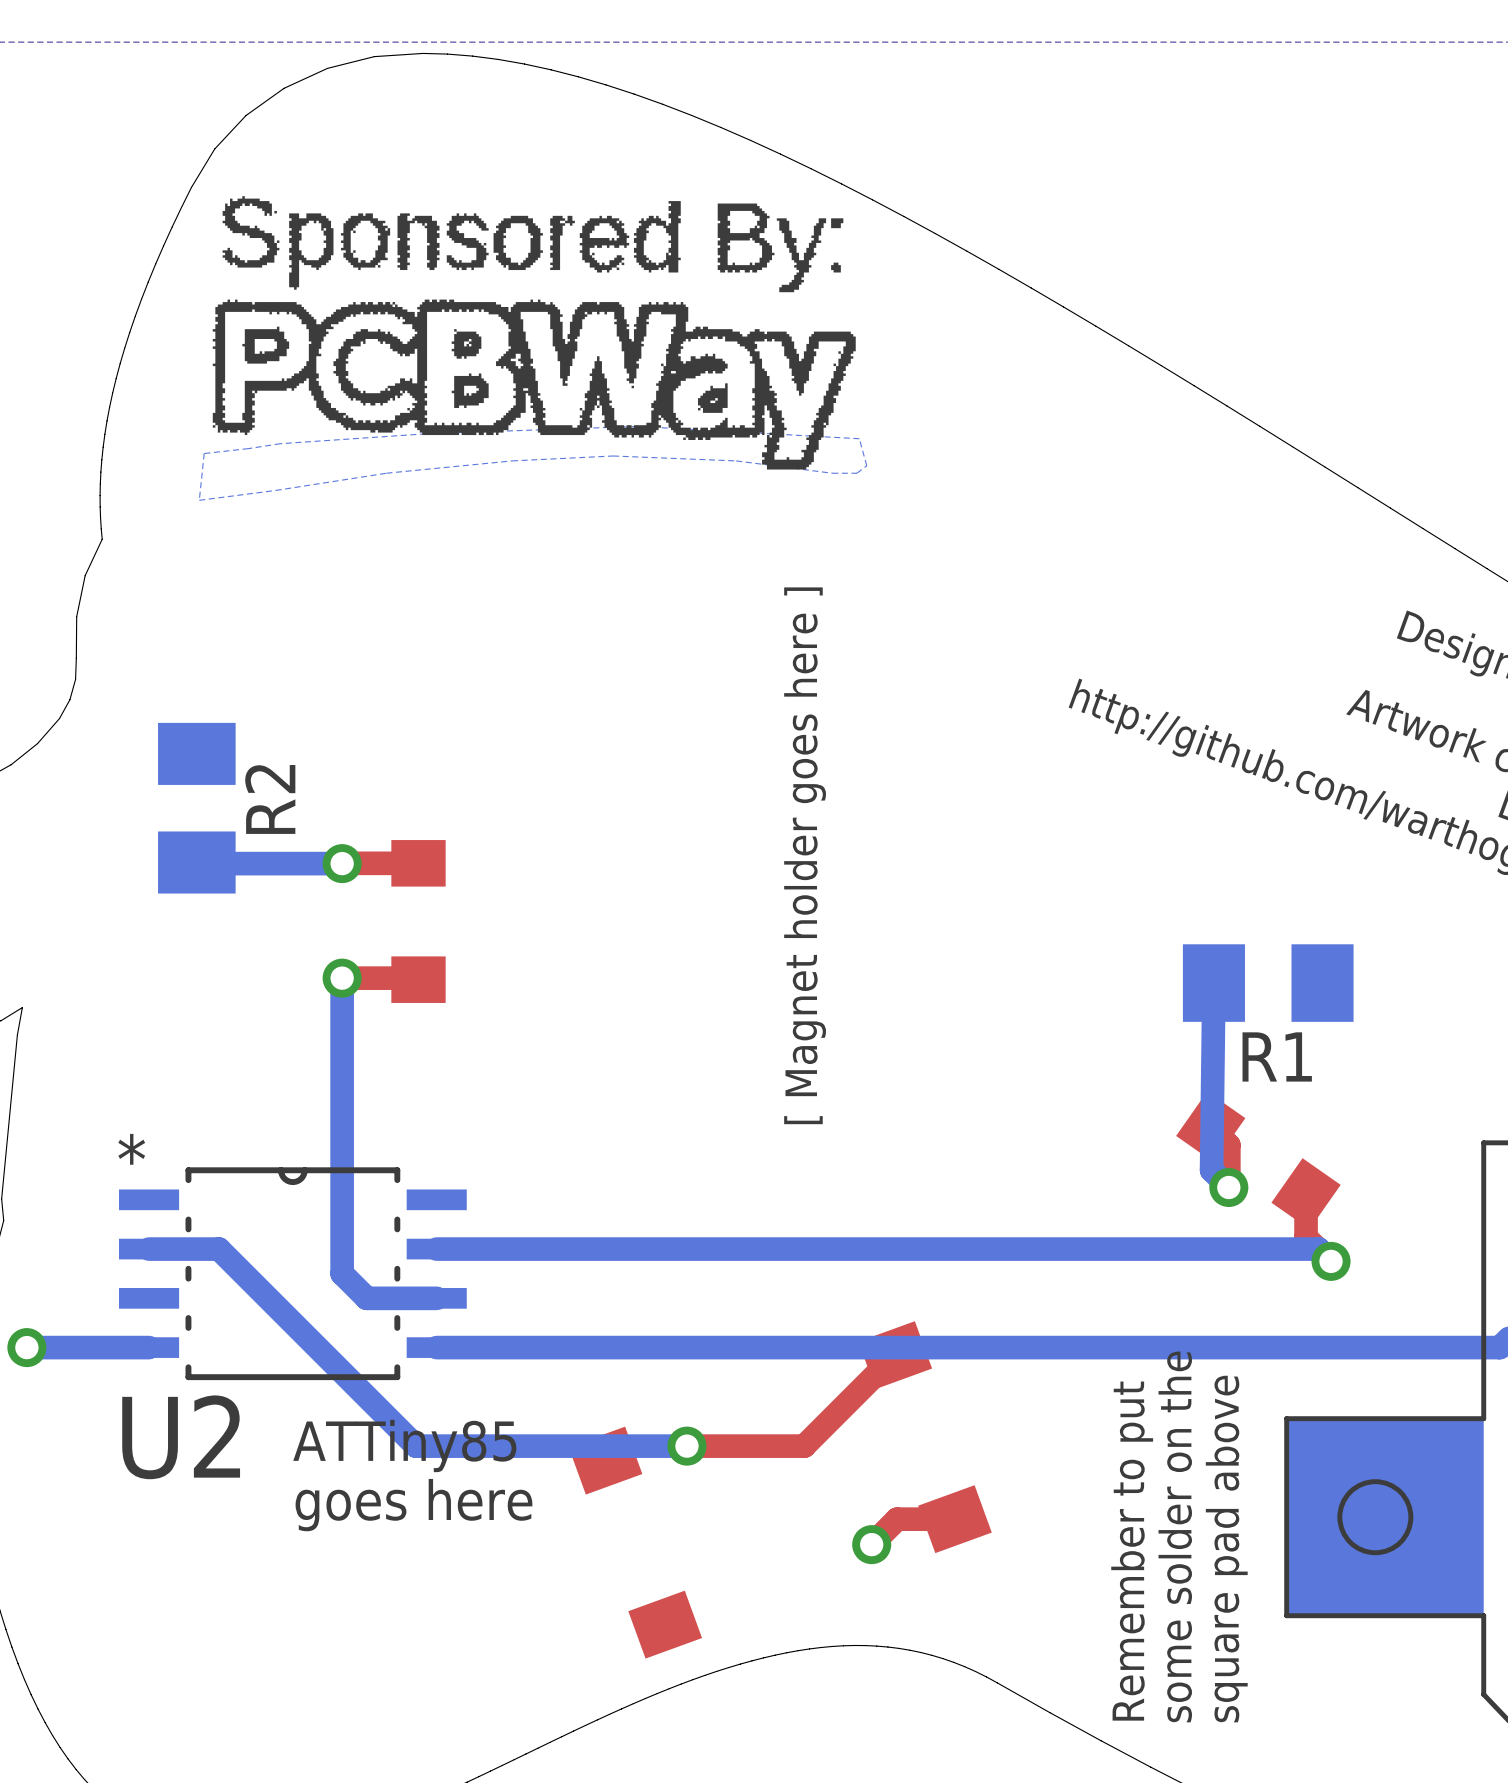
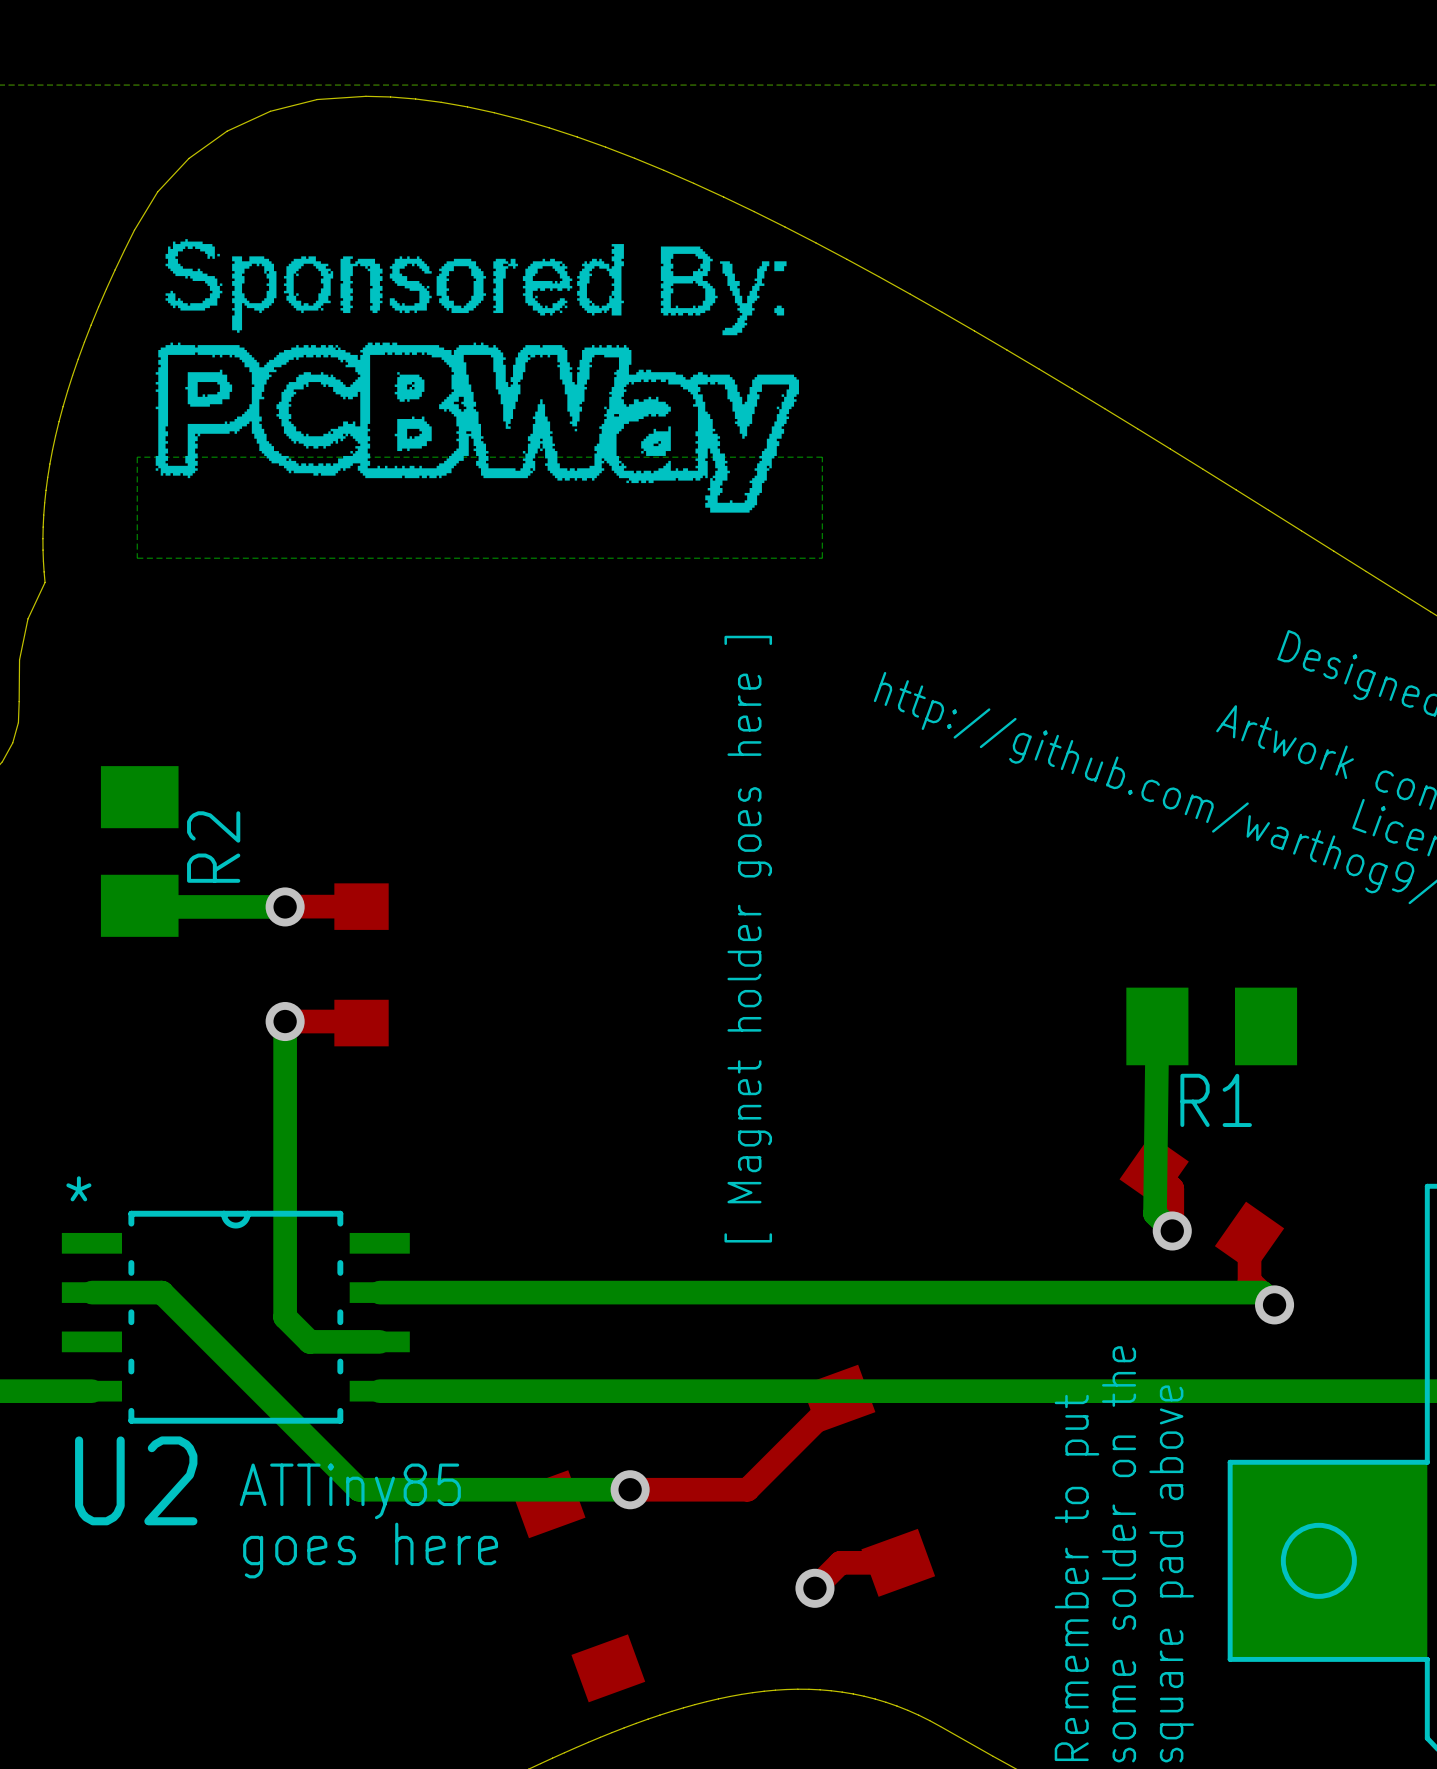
bottom zone outline: (637, 426) (859, 438) (866, 465) (856, 473) (832, 473) (736, 460) (613, 455) (512, 460) (386, 473) (199, 500) (204, 453) (280, 443) (425, 433) (637, 426) -> (822, 457) (822, 558) (137, 558) (137, 457) (822, 457)

